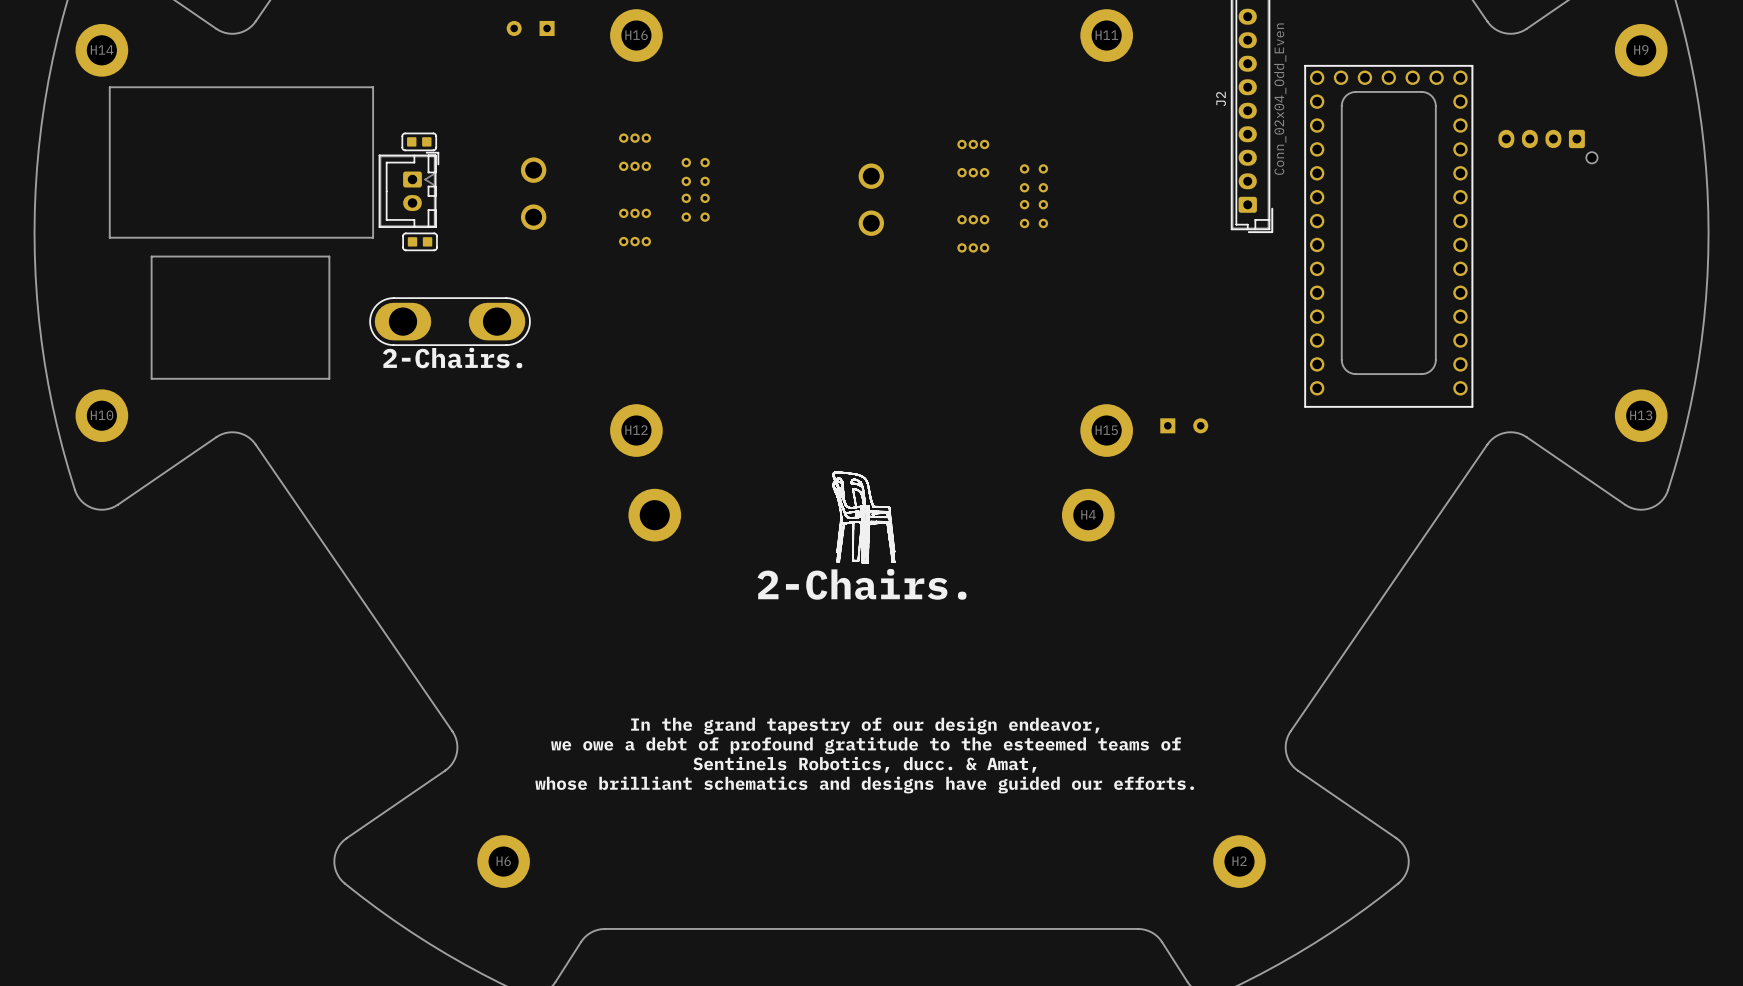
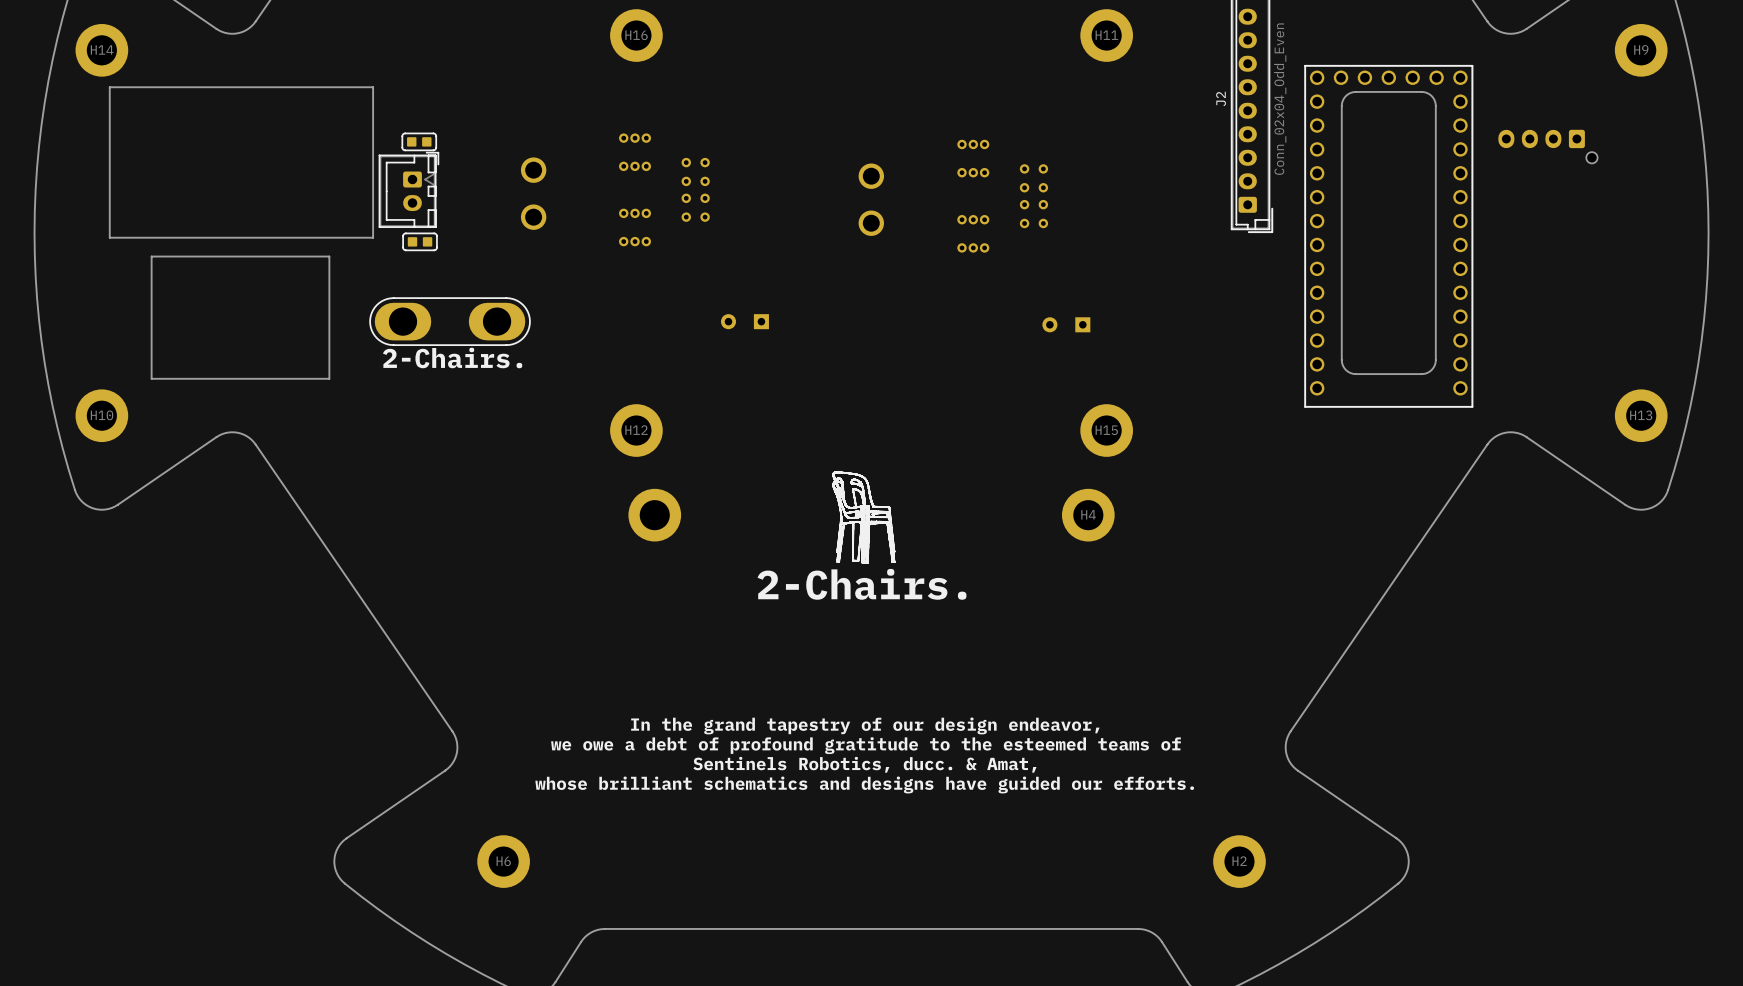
part: (530, 28) -> none
part: none -> (744, 321)
part rotation: 0° (1184, 425) -> 180° (1066, 324)
part position: (1184, 425) -> (1066, 324)

